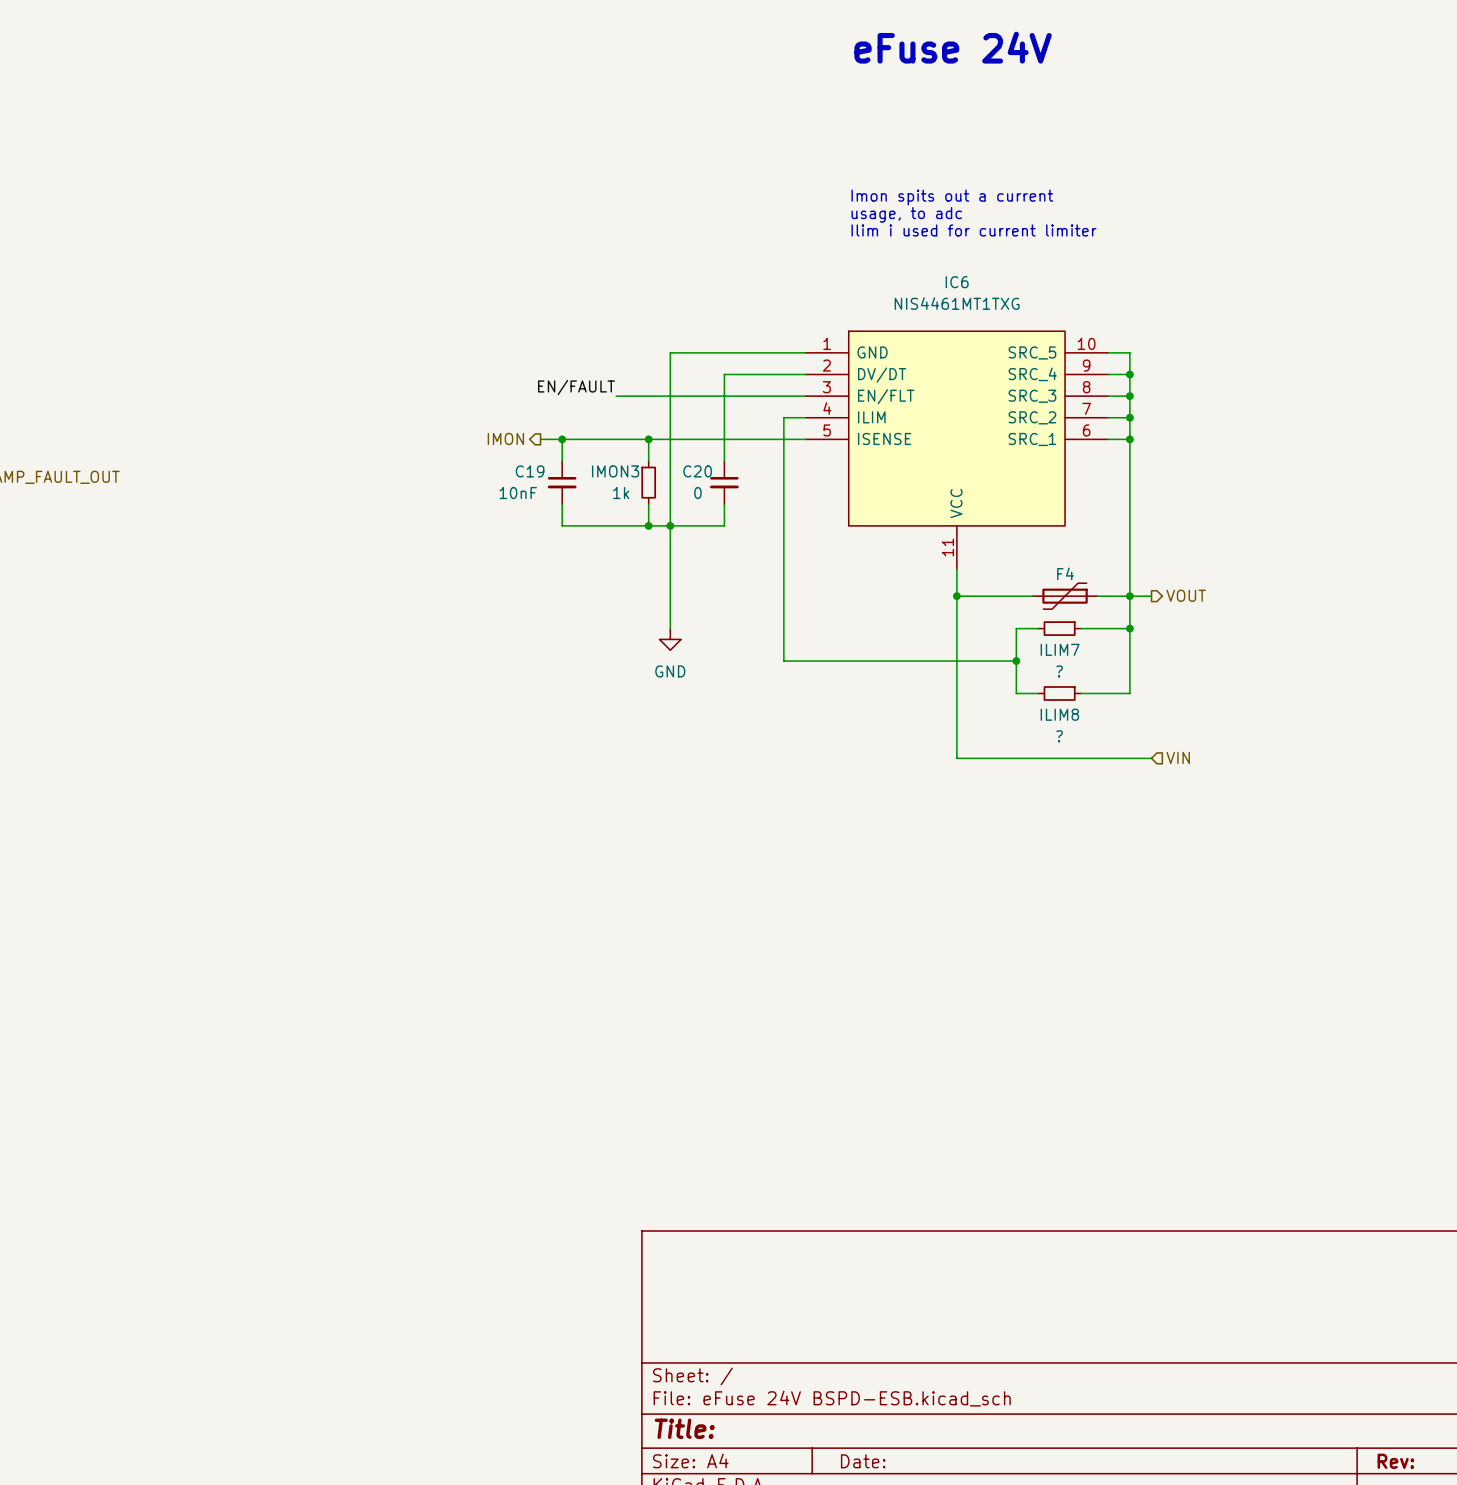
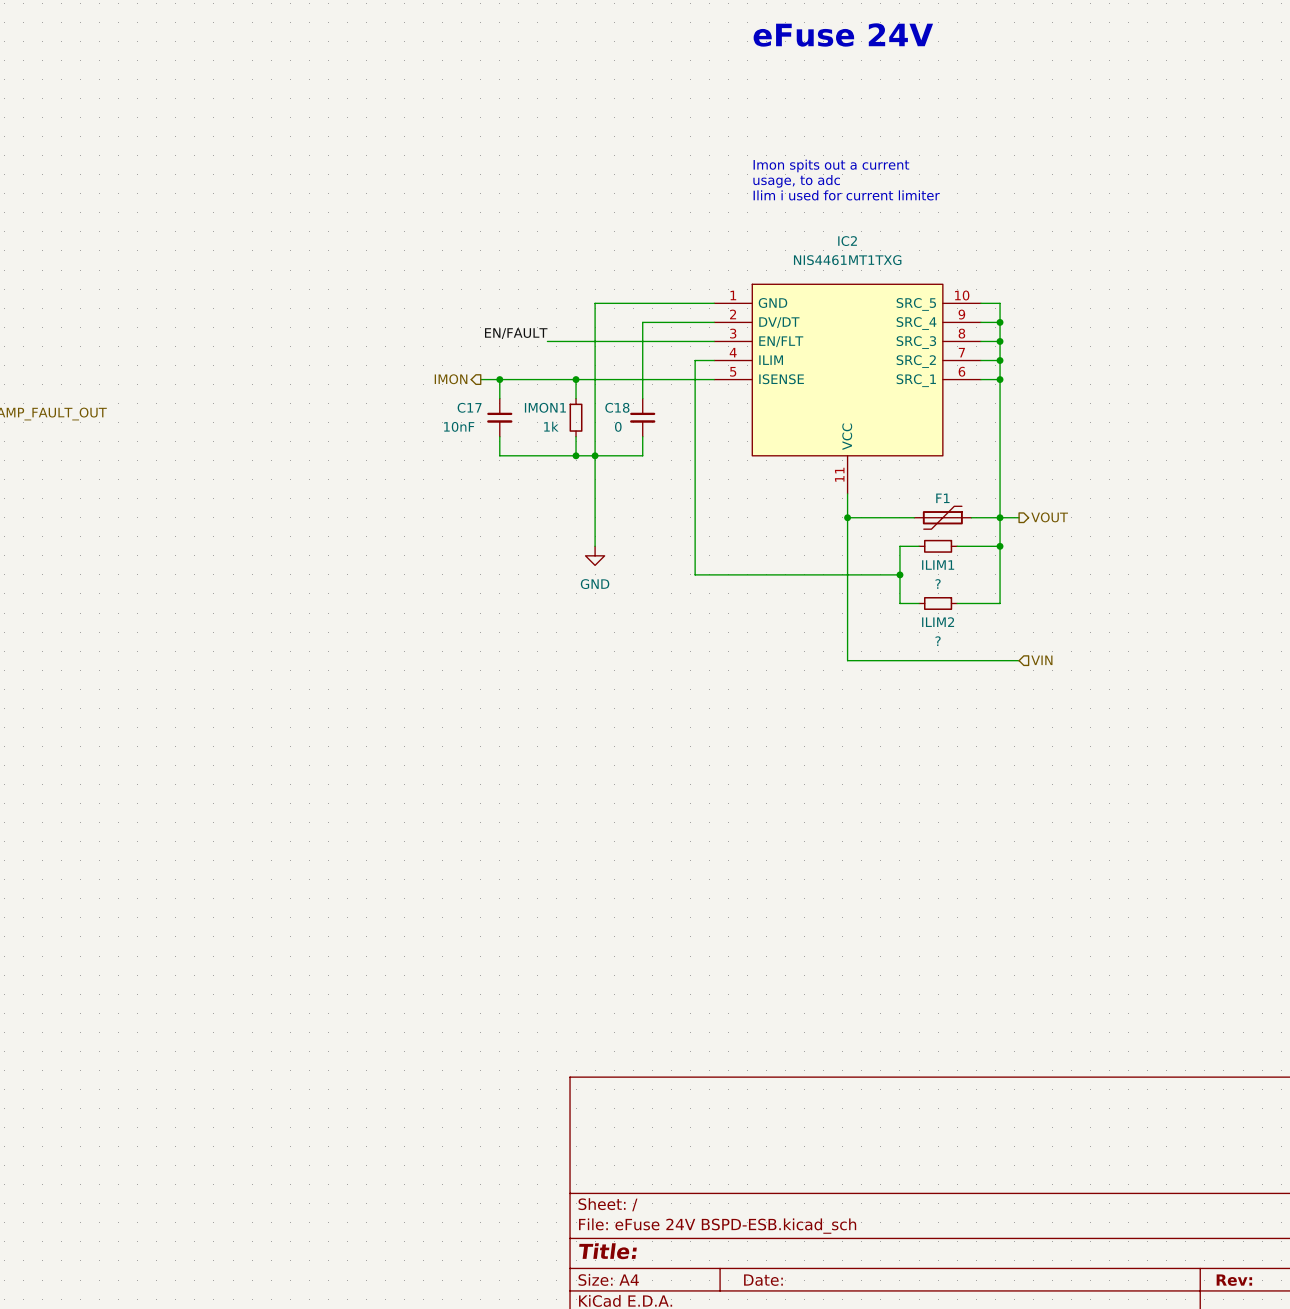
IC6 name: IC6 (957, 282) -> IC2 (847, 241)
C19 name: C19 (530, 471) -> C17 (469, 407)
IMON3 name: IMON3 (615, 471) -> IMON1 (545, 407)
C20 name: C20 (697, 471) -> C18 (617, 407)
F4 name: F4 (1065, 573) -> F1 (942, 498)
ILIM7 name: ILIM7 (1060, 649) -> ILIM1 (938, 565)
ILIM8 name: ILIM8 (1059, 714) -> ILIM2 (938, 622)

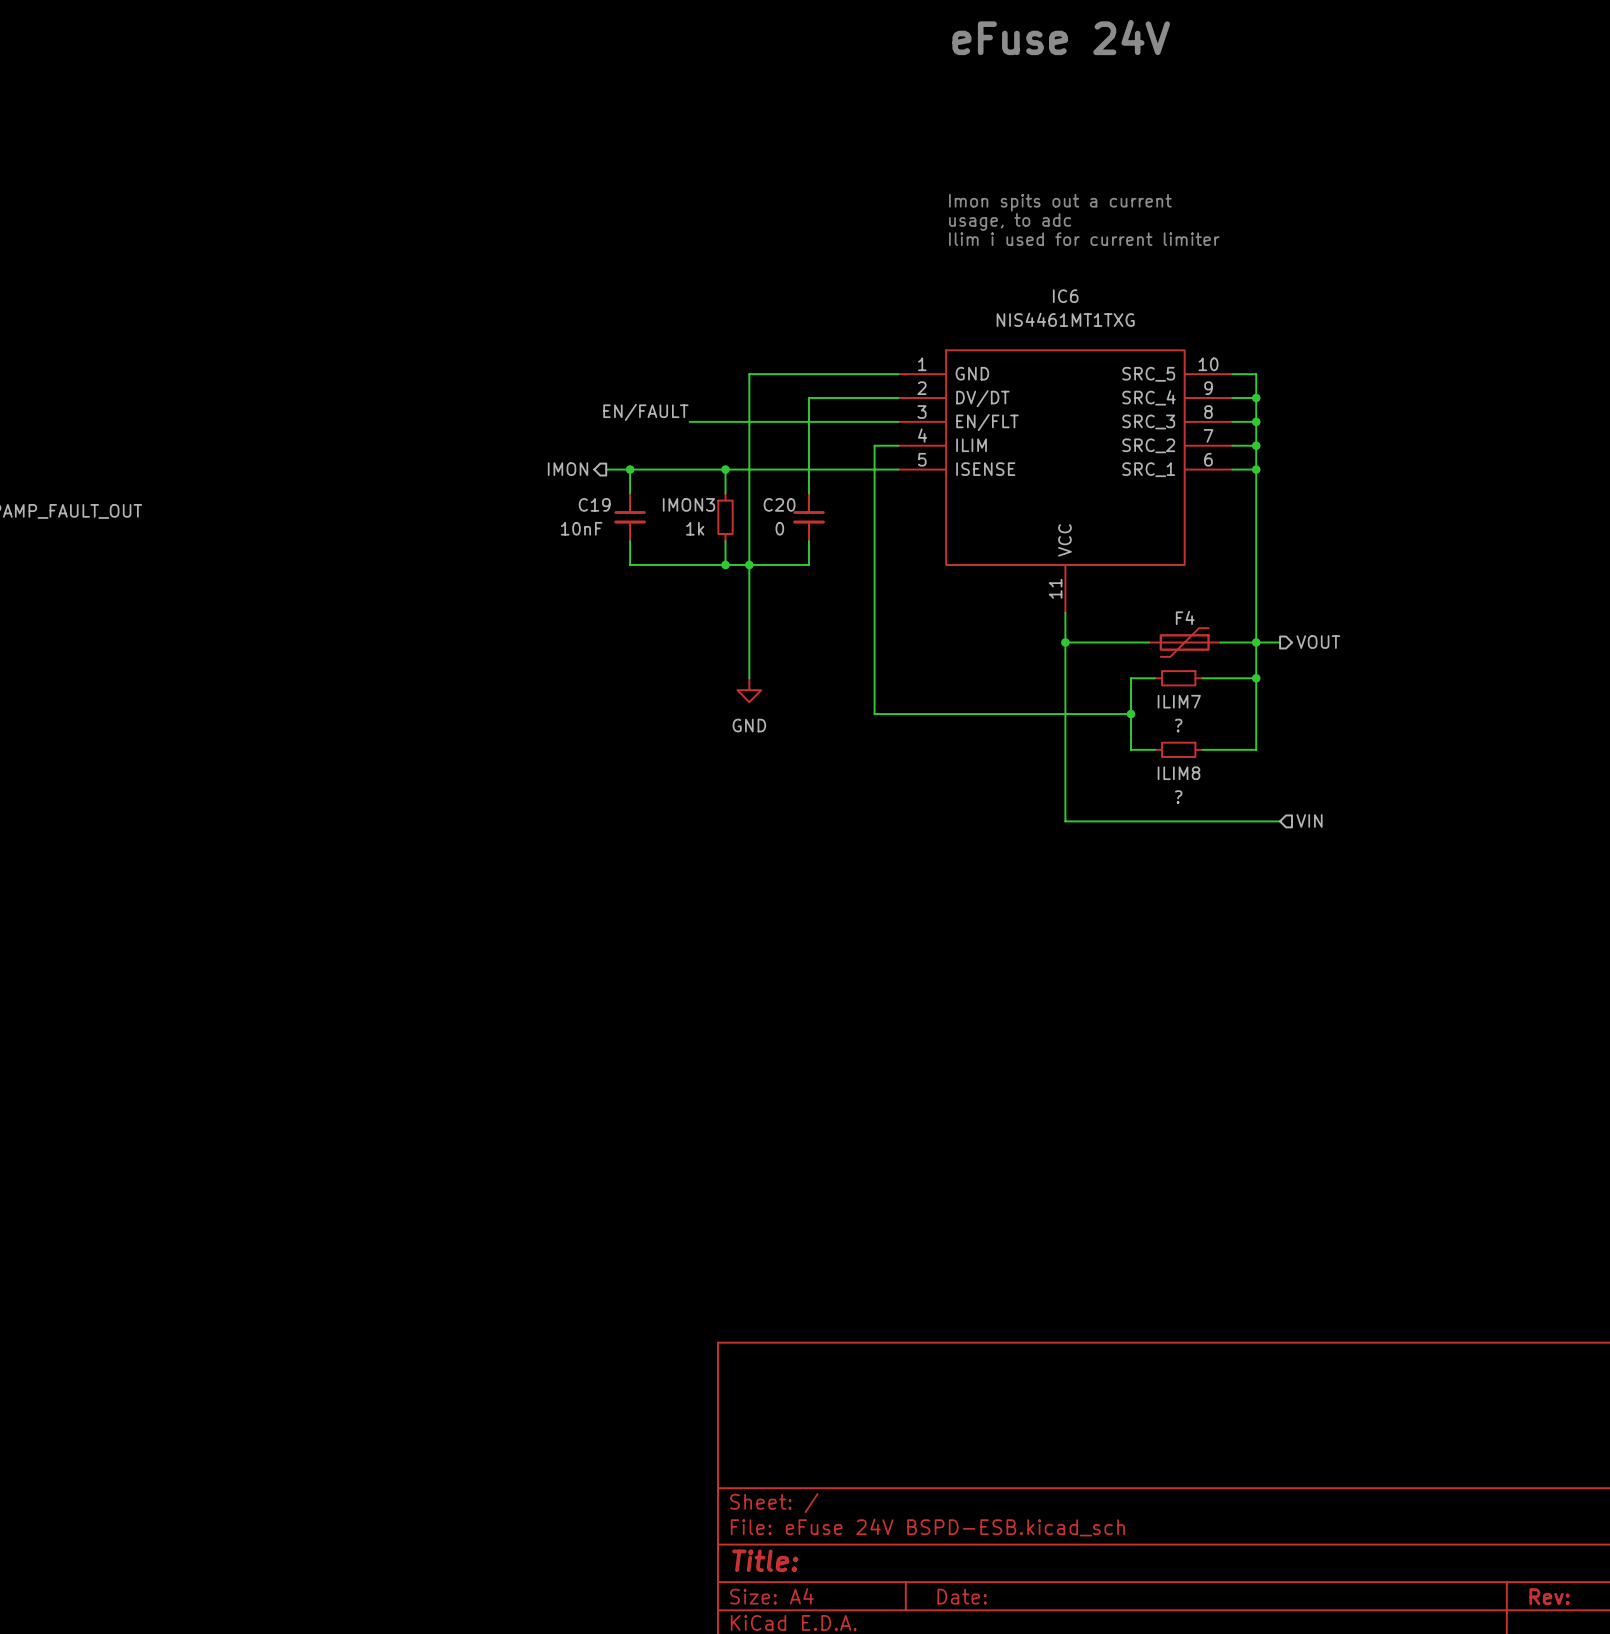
IC2 name: IC2 (847, 241) -> IC6 (1065, 296)
C17 name: C17 (469, 407) -> C19 (594, 504)
IMON1 name: IMON1 (545, 407) -> IMON3 (688, 504)
C18 name: C18 (617, 407) -> C20 (779, 504)
F1 name: F1 (942, 498) -> F4 (1185, 617)
ILIM1 name: ILIM1 (938, 565) -> ILIM7 (1179, 701)
ILIM2 name: ILIM2 (938, 622) -> ILIM8 (1178, 773)

